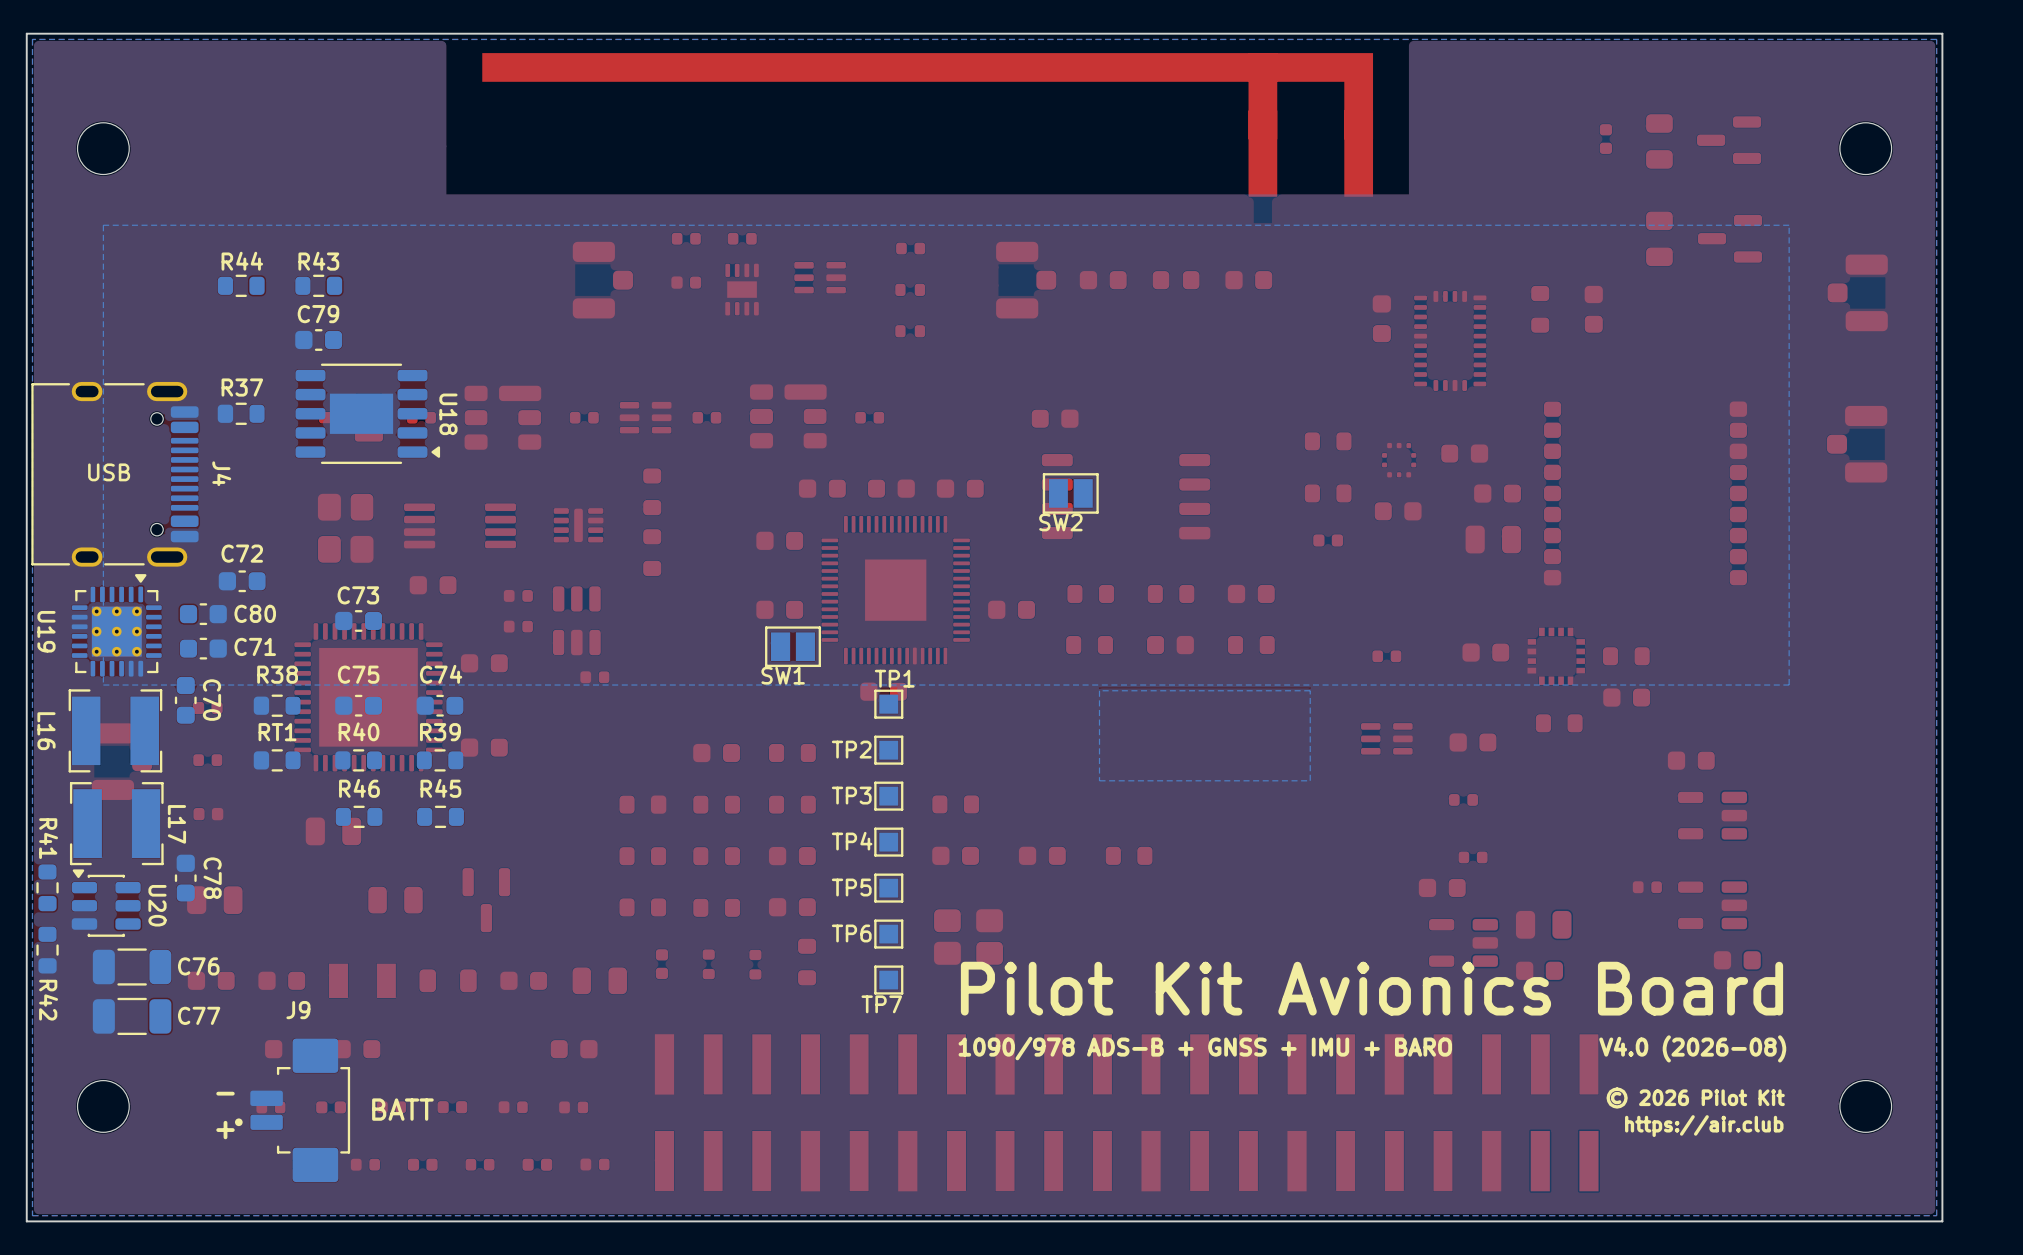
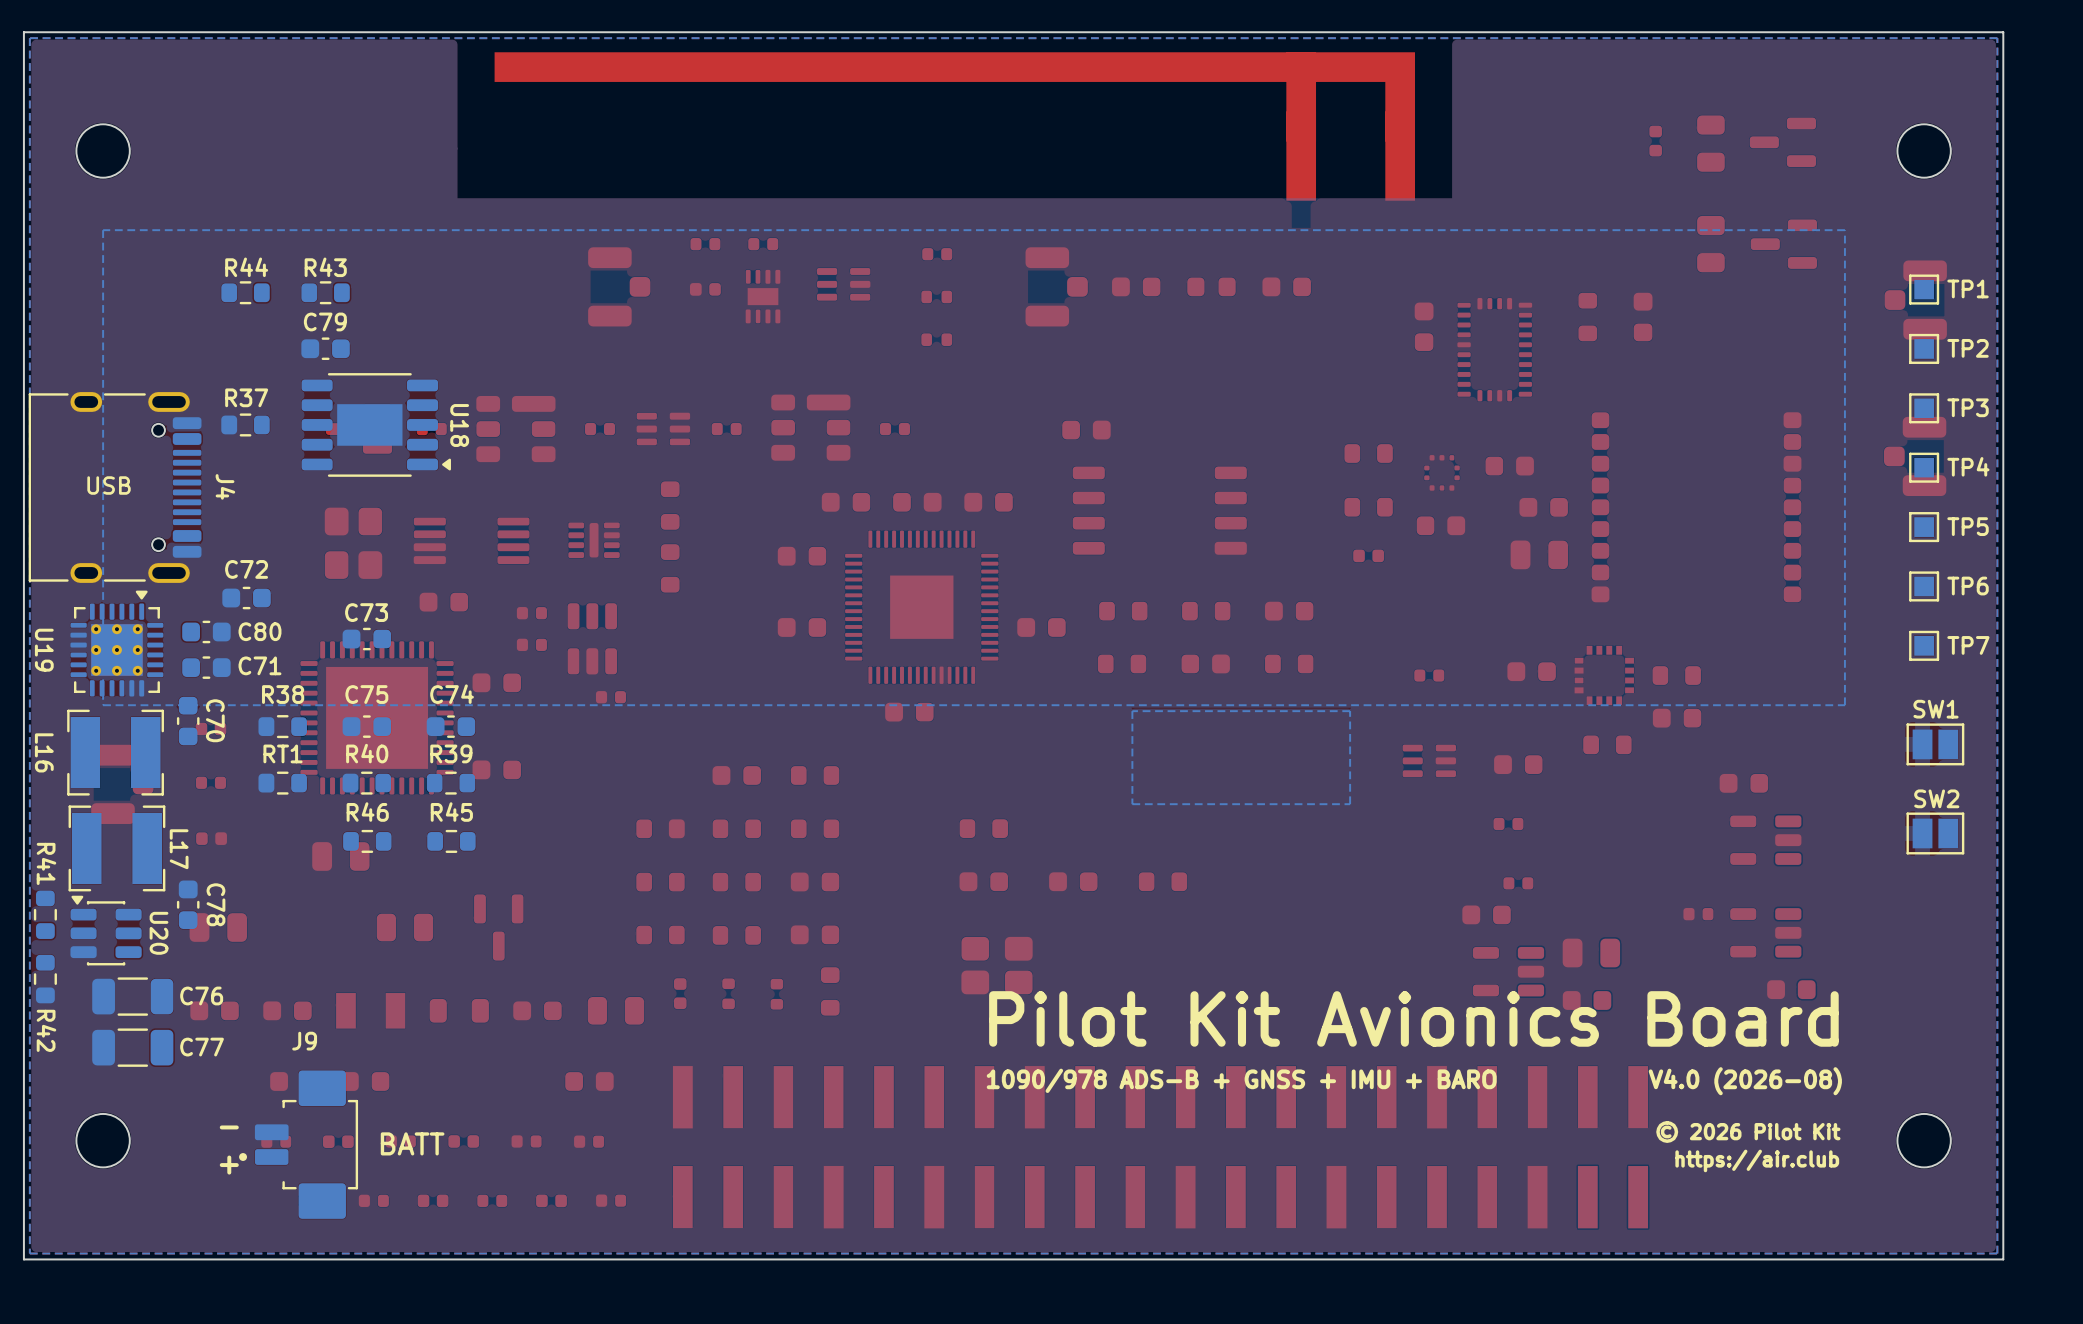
SW2 position: (1070, 493) -> (1935, 833)
SW2 name position: SW2 (1060, 522) -> SW2 (1936, 798)
SW1 position: (793, 646) -> (1935, 744)
SW1 name position: SW1 (783, 675) -> SW1 (1936, 709)
TP1 name position: TP1 (894, 678) -> TP1 (1968, 288)
TP1 position: (888, 704) -> (1924, 289)
TP2 name position: TP2 (851, 749) -> TP2 (1968, 348)
TP2 position: (888, 750) -> (1924, 348)
TP3 name position: TP3 (851, 795) -> TP3 (1968, 407)
TP3 position: (888, 796) -> (1924, 408)
TP4 name position: TP4 (852, 841) -> TP4 (1968, 466)
TP4 position: (888, 842) -> (1924, 467)
TP5 name position: TP5 (851, 887) -> TP5 (1968, 526)
TP5 position: (888, 888) -> (1924, 527)
TP6 name position: TP6 (851, 933) -> TP6 (1968, 586)
TP6 position: (888, 934) -> (1924, 586)
TP7 position: (888, 980) -> (1924, 645)
TP7 name position: TP7 (881, 1004) -> TP7 (1968, 645)

